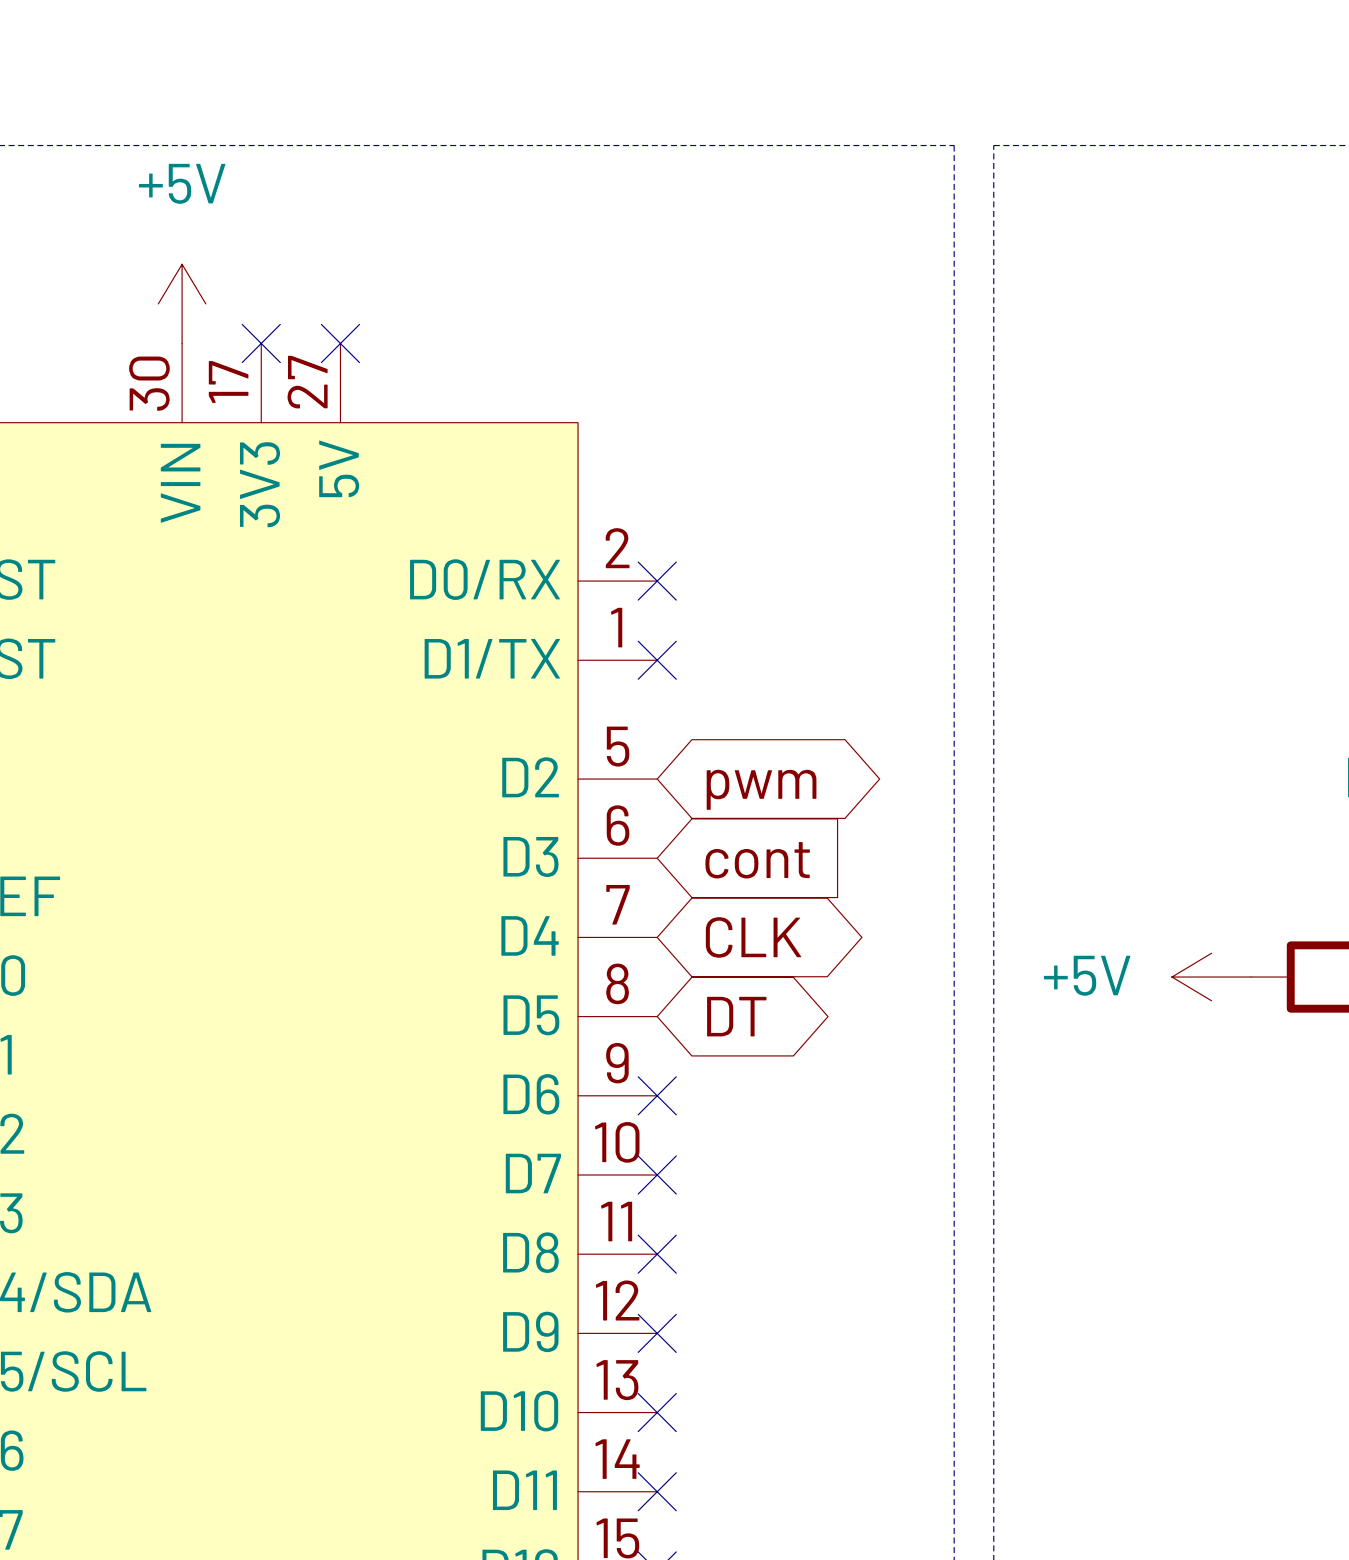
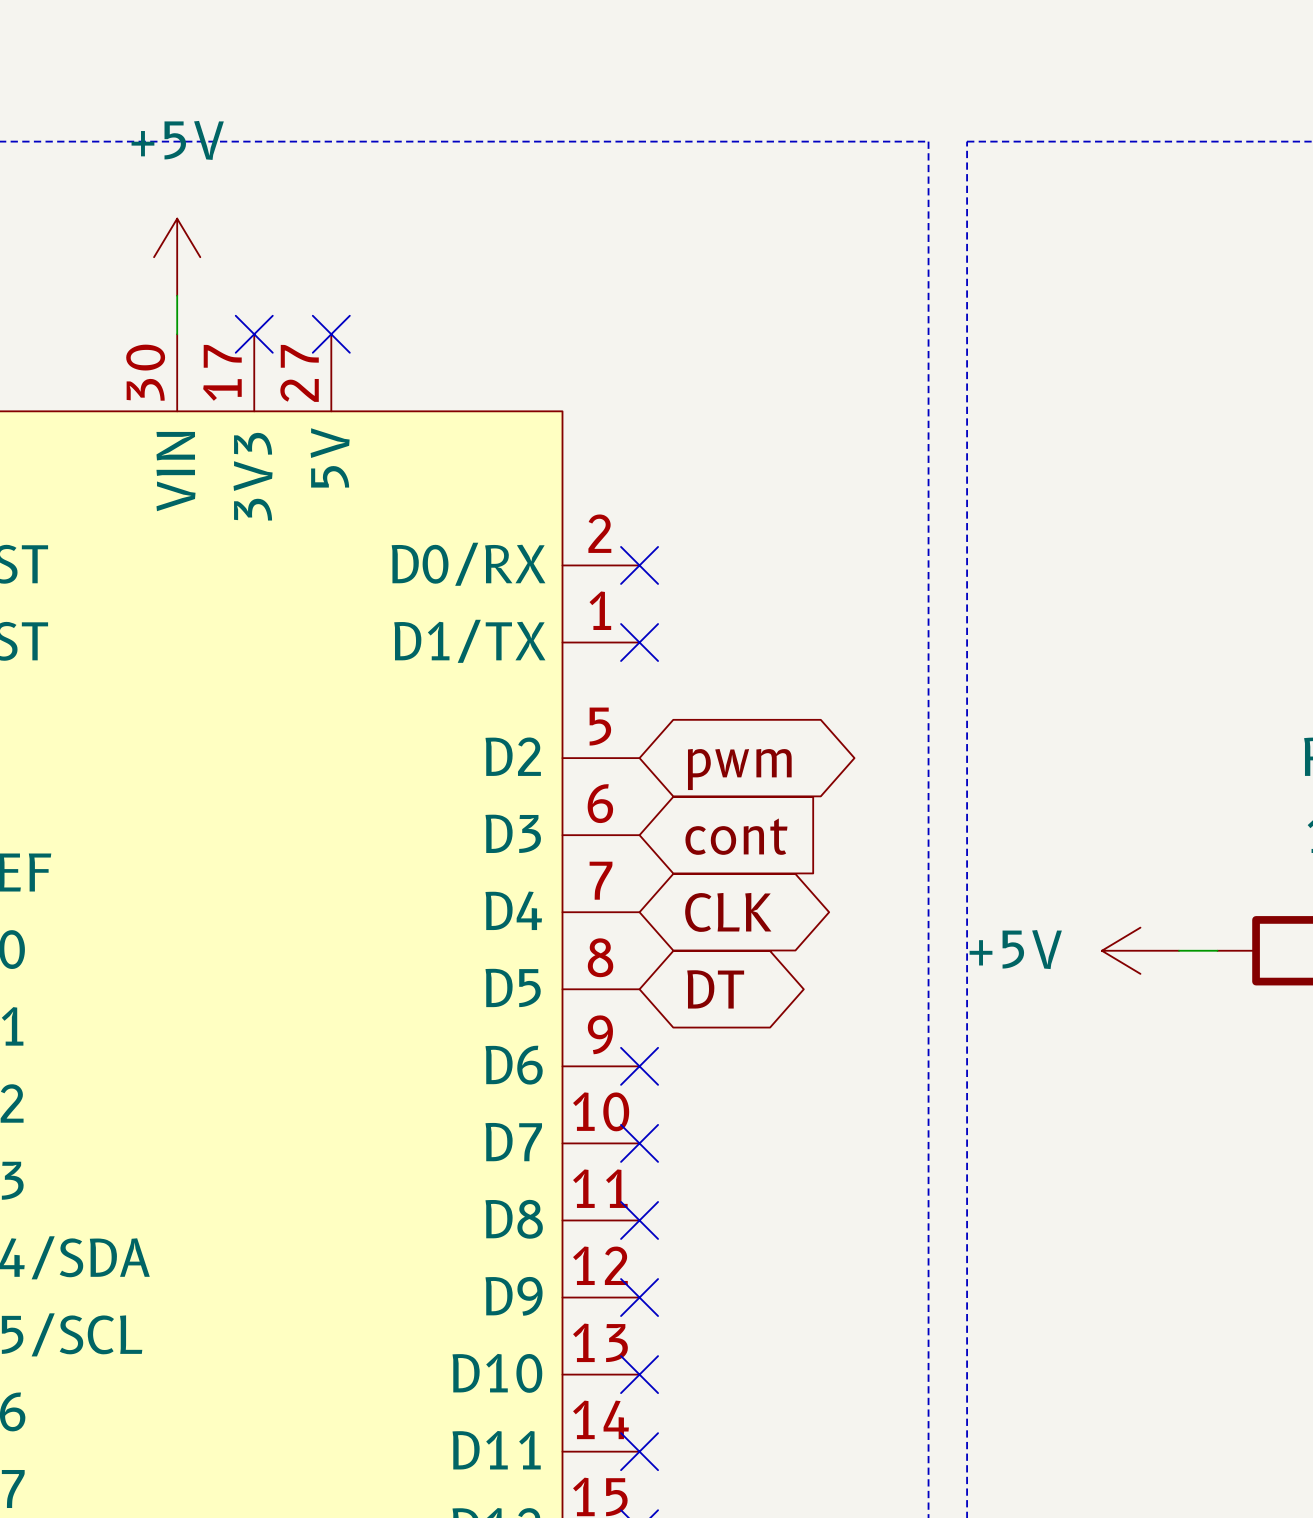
power symbol position: +5V (182, 303) -> +5V (177, 257)
power symbol position: +5V (1211, 977) -> +5V (1140, 950)

